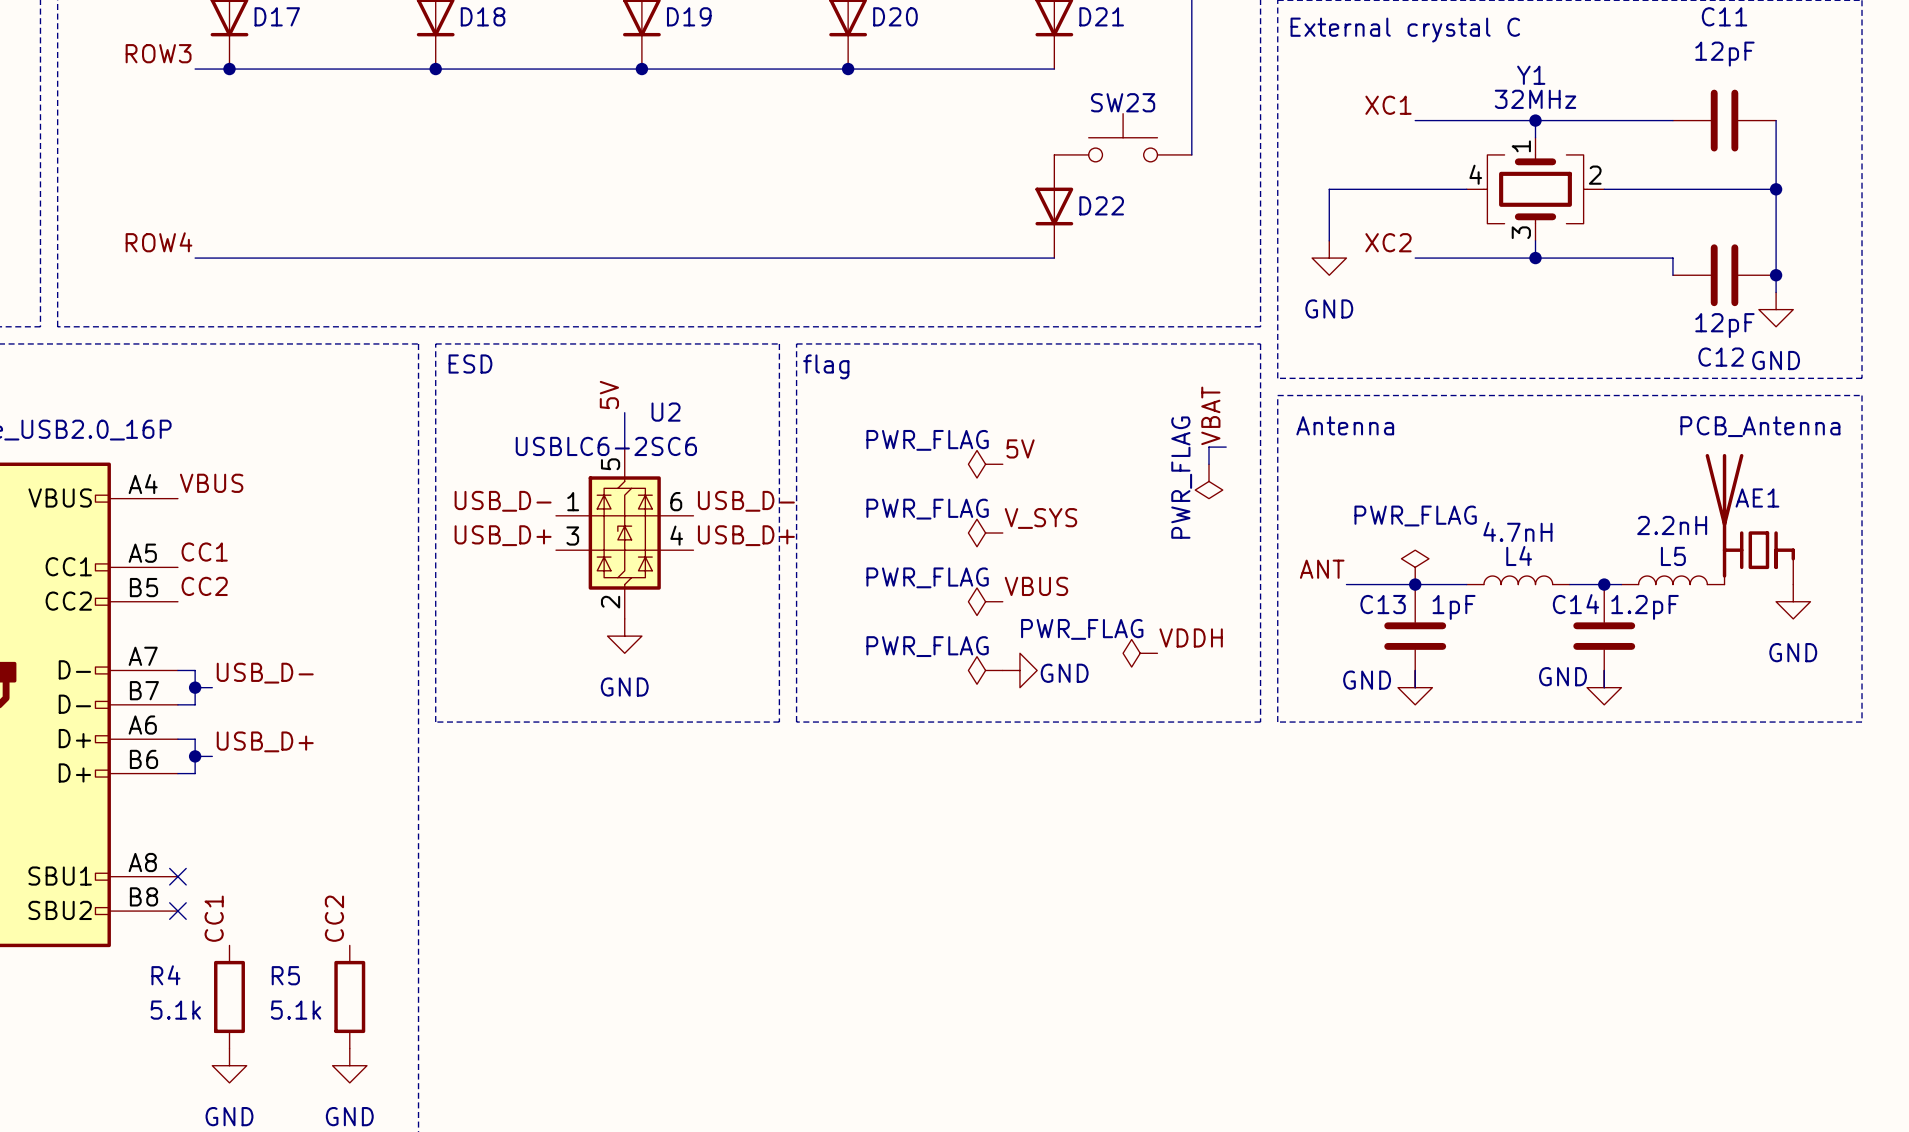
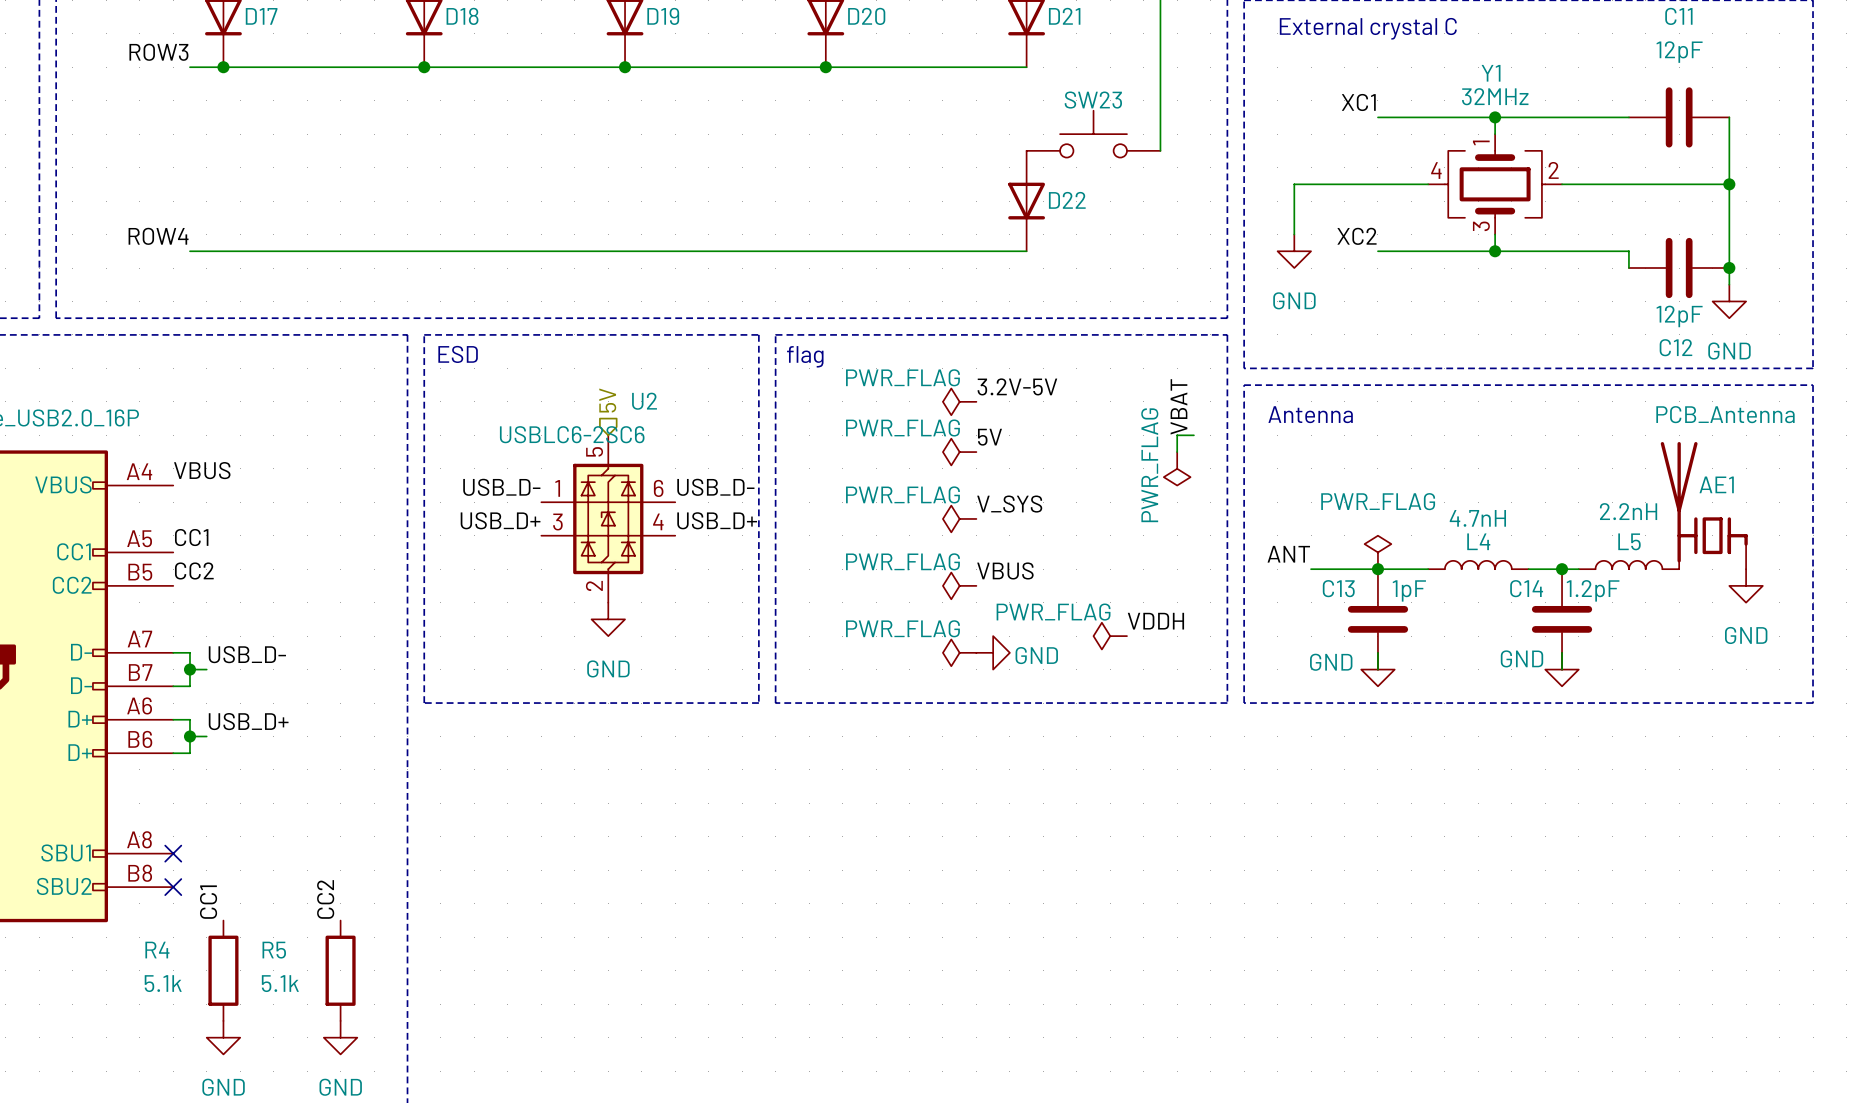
label: 5V (609, 394) -> none
label: none -> 3.2V-5V (1017, 386)
hierarchical label: none -> 5V (607, 400)
wire: (624, 412) (624, 447) -> none
power symbol: none -> PWR_FLAG (959, 401)

